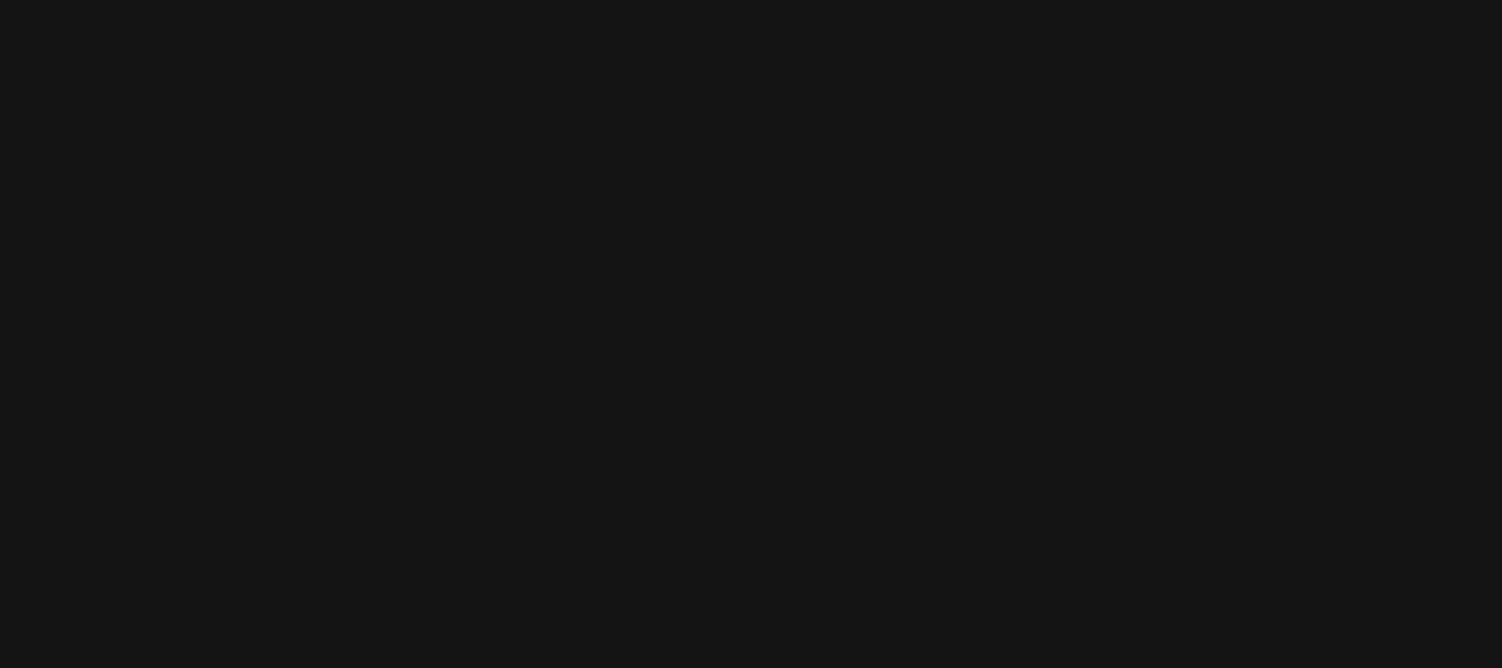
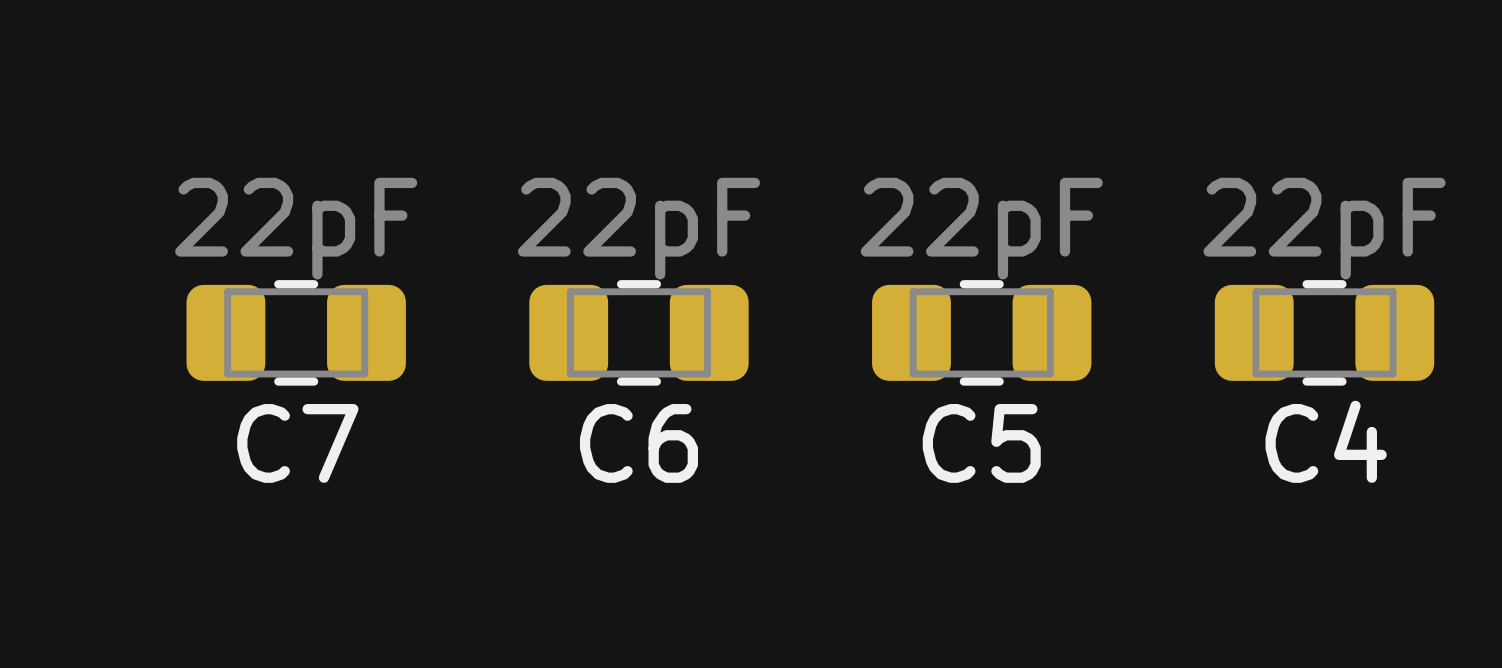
C7: none -> 22pF (296, 332)
C6: none -> 22pF (638, 332)
C5: none -> 22pF (981, 332)
C4: none -> 22pF (1324, 332)

